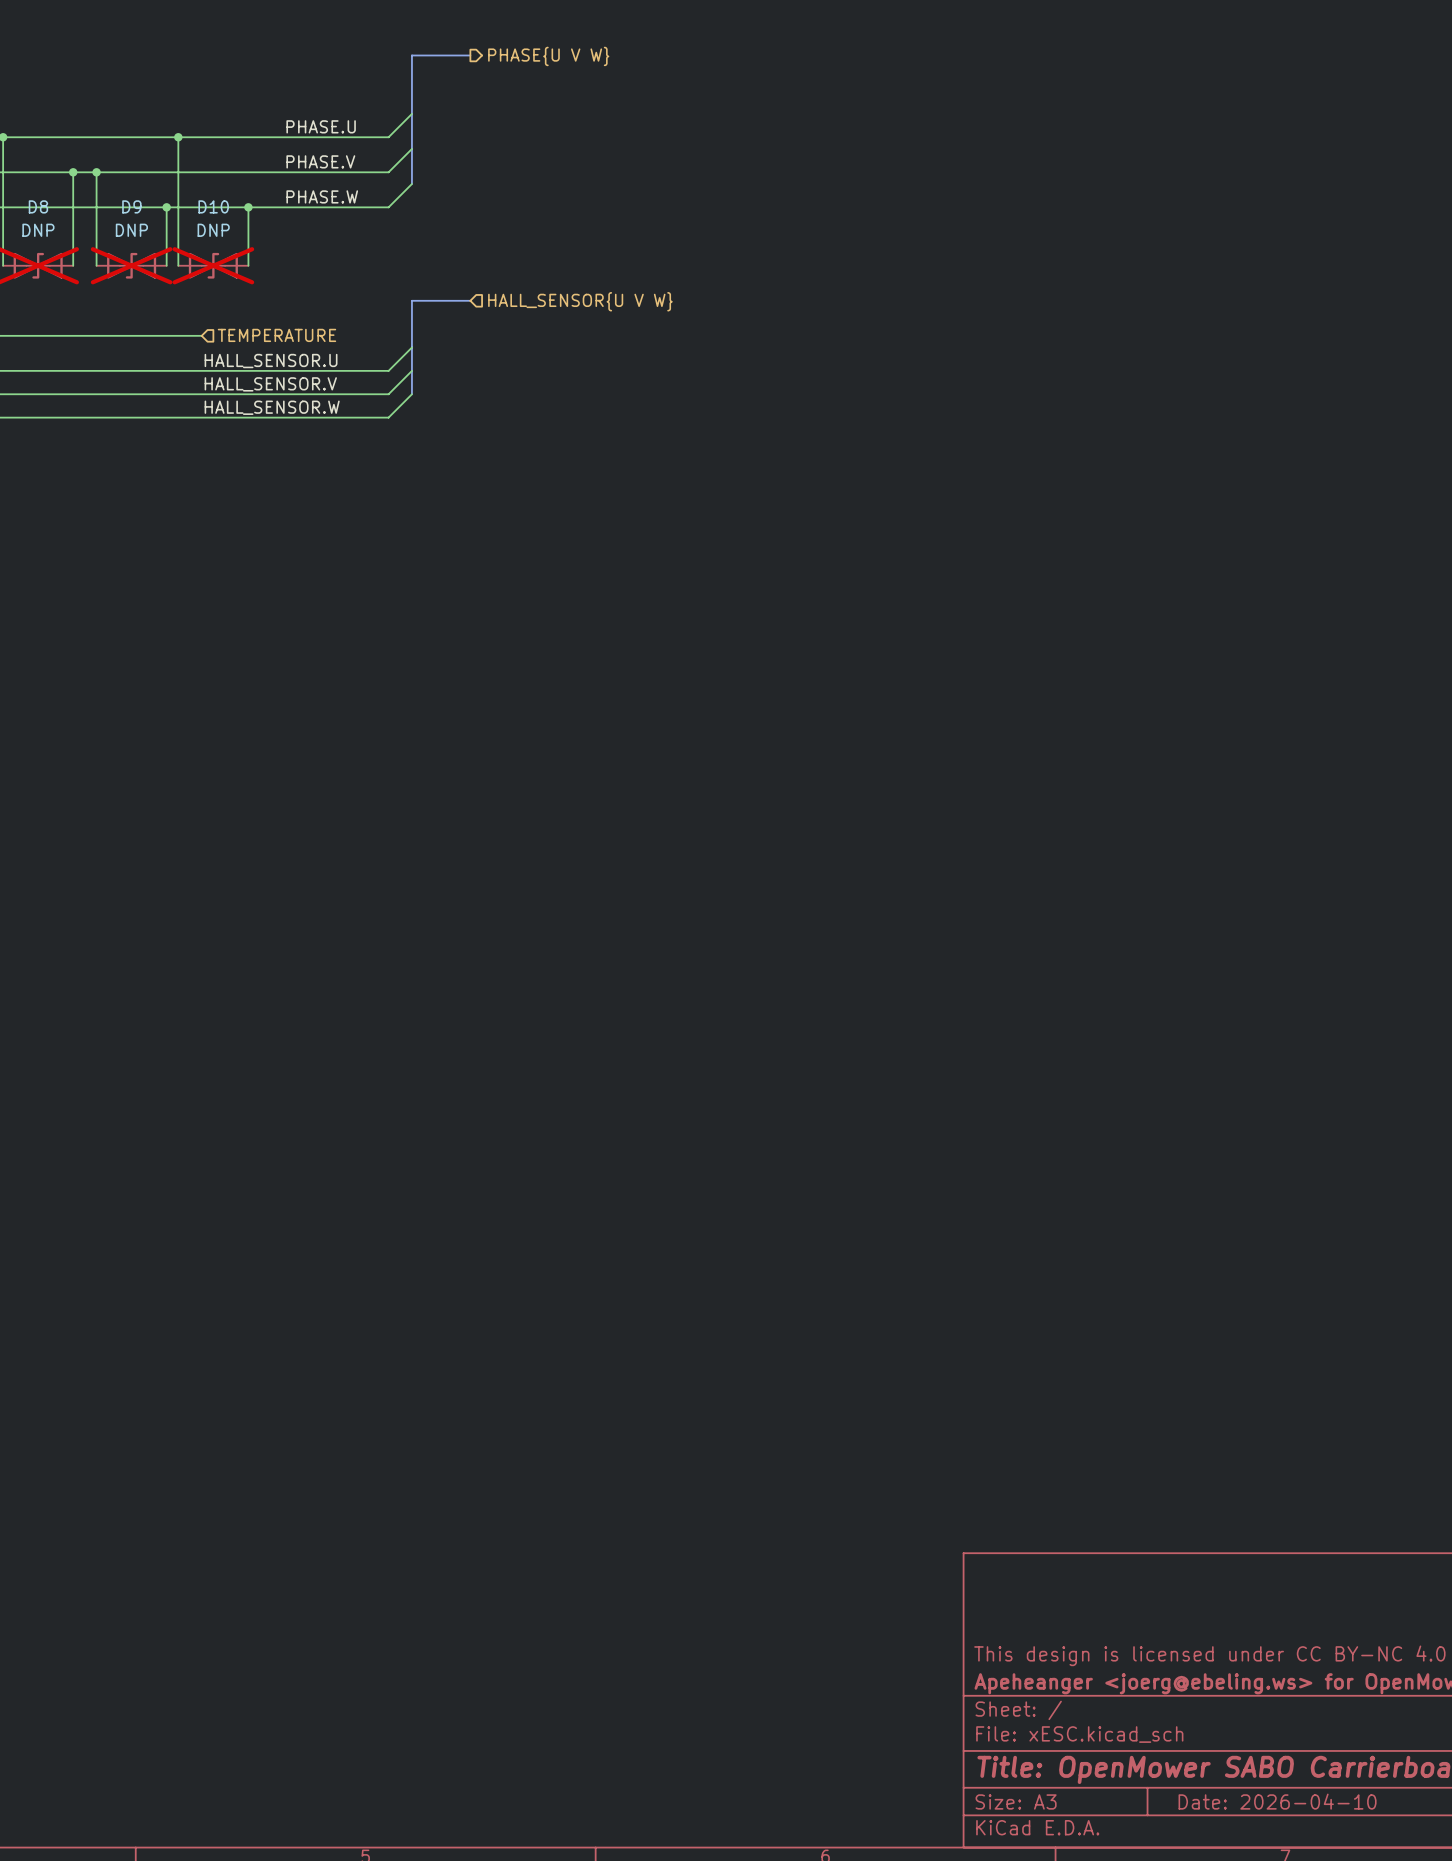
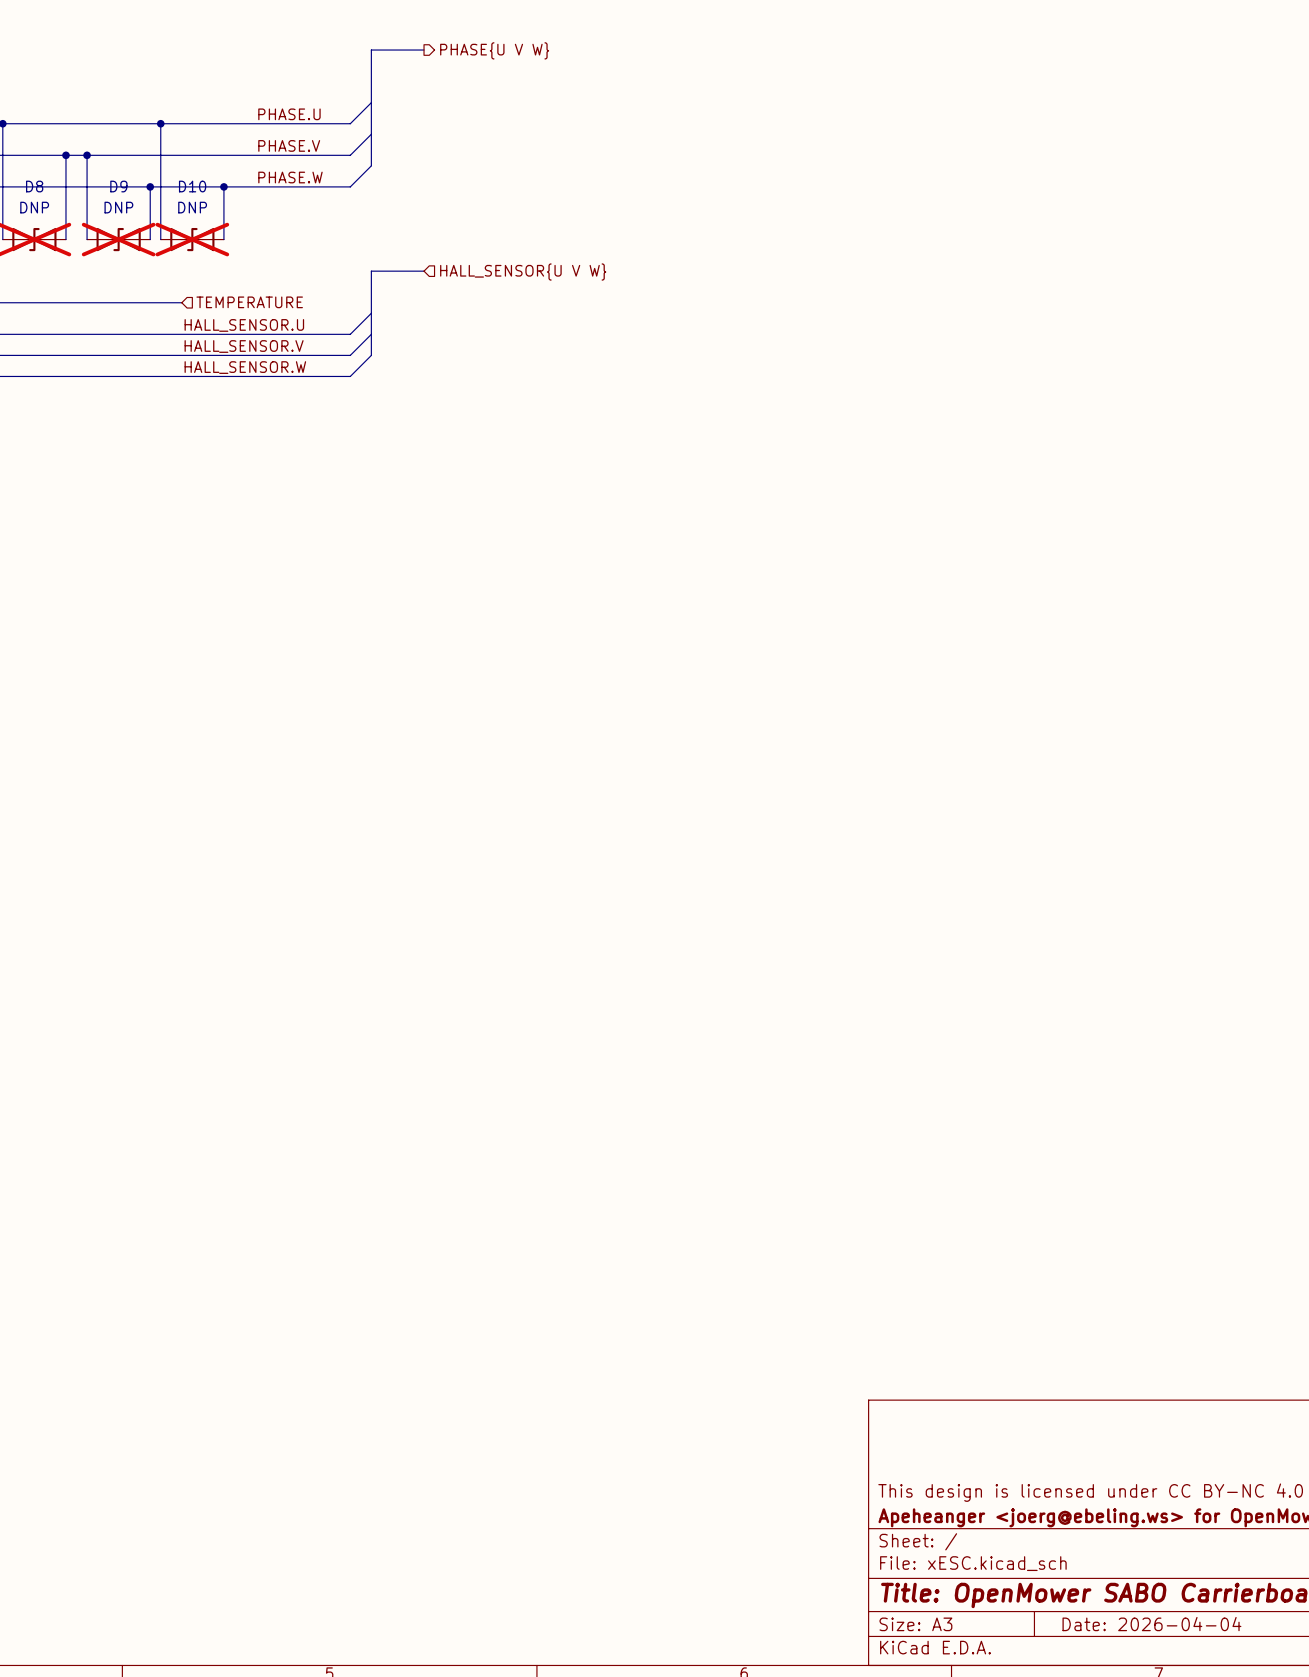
title block: Date: 2026-04-10 (1277, 1801) -> Date: 2026-04-04 (1151, 1624)

